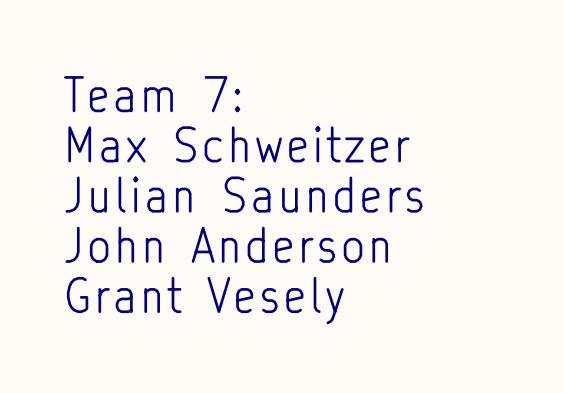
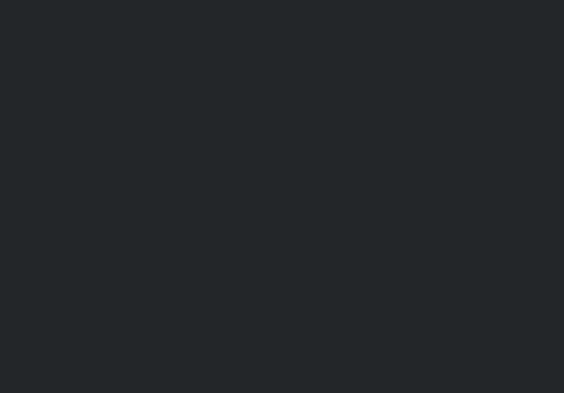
text: Team 7: (152, 94) -> none
text: Max Schweitzer (238, 144) -> none
text: Julian Saunders (243, 194) -> none
text: John Anderson (226, 244) -> none
text: Grant Vesely (205, 300) -> none

